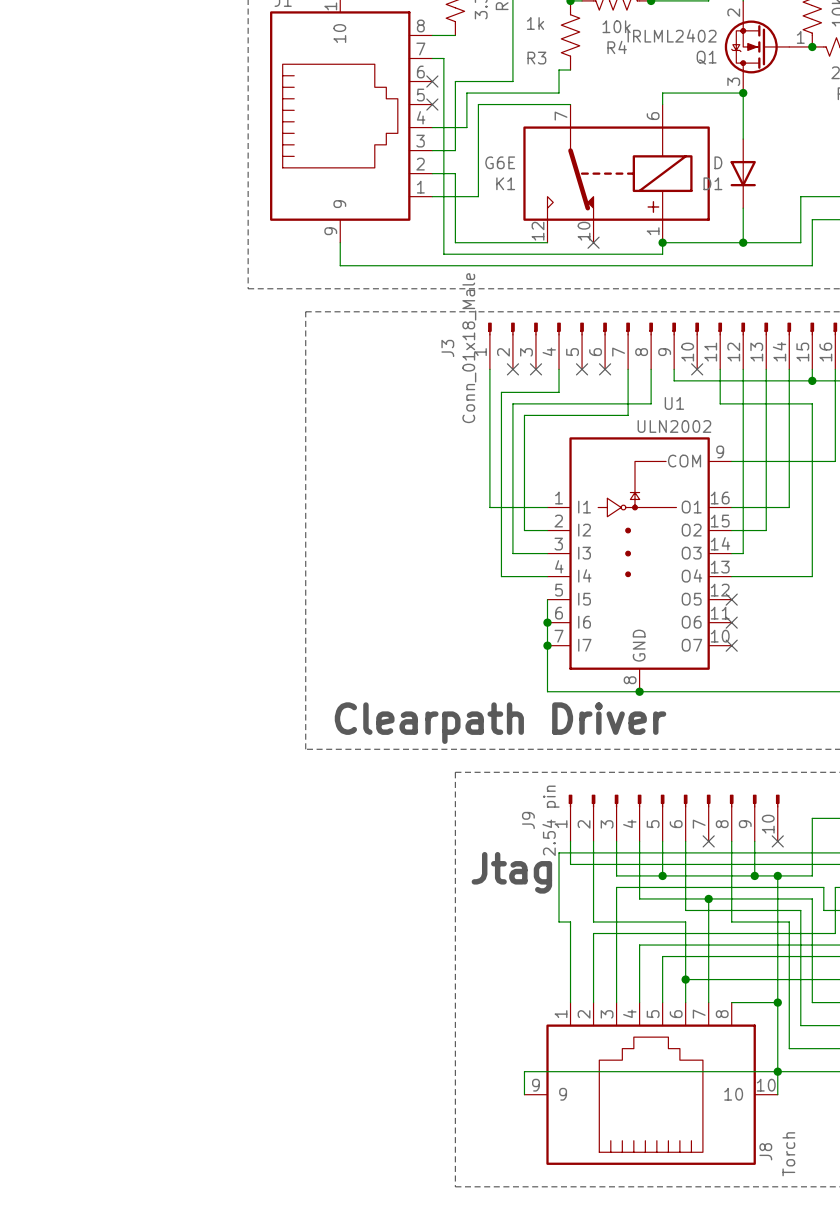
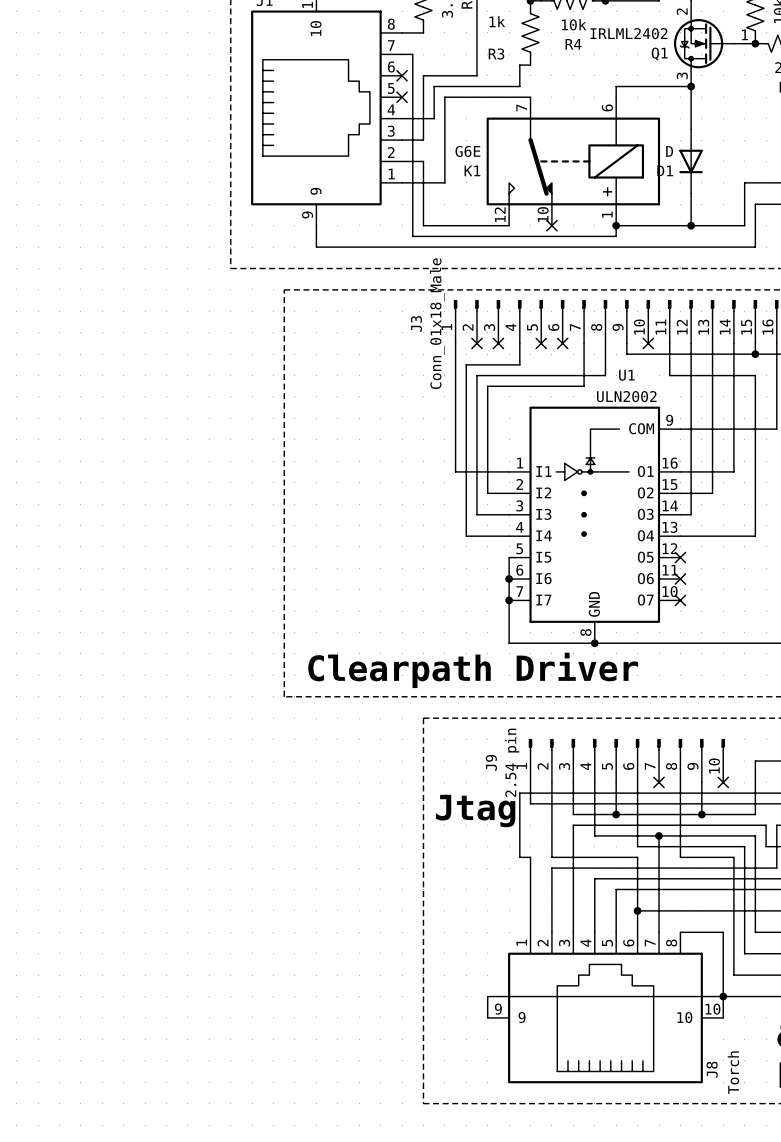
wire: (777, 875) (777, 1002) -> none
junction: (777, 875) -> none
junction: (777, 1002) -> none

